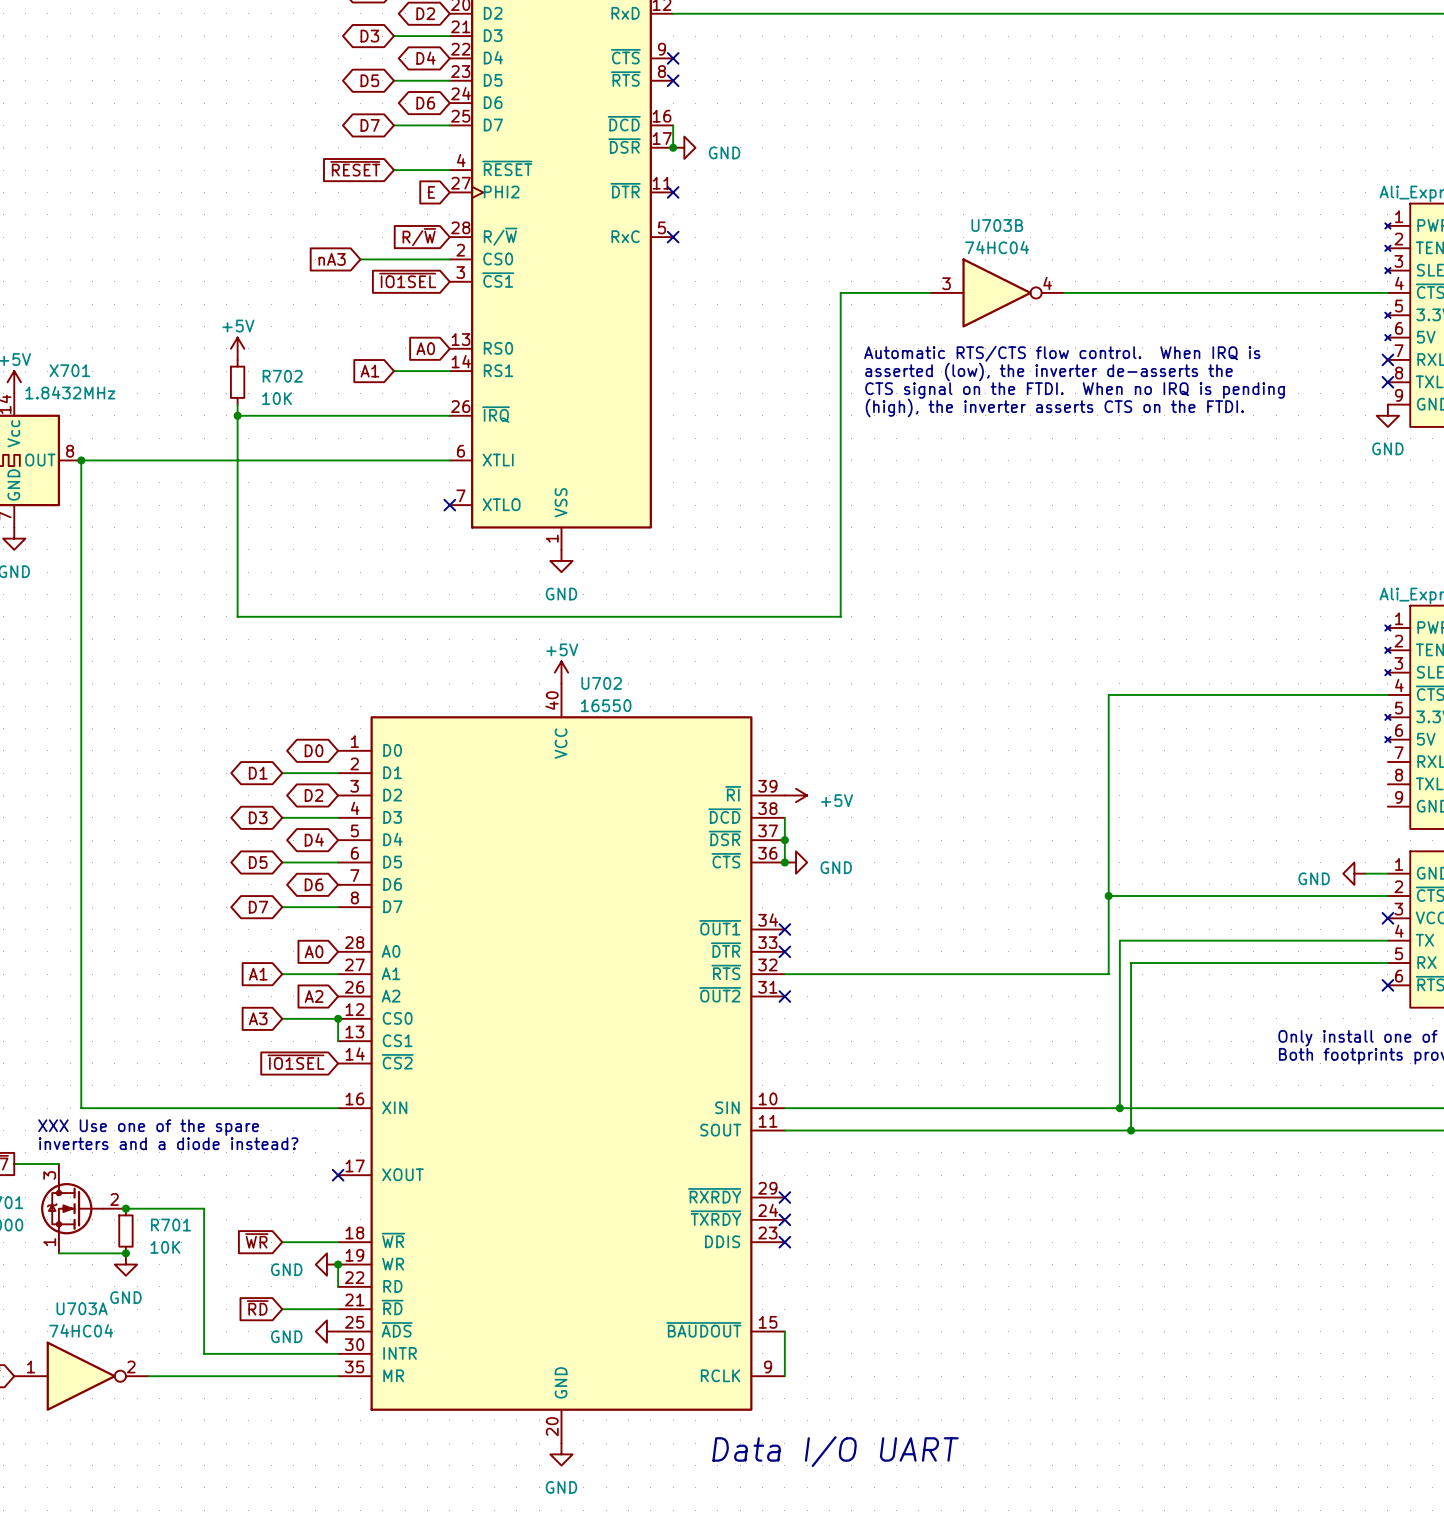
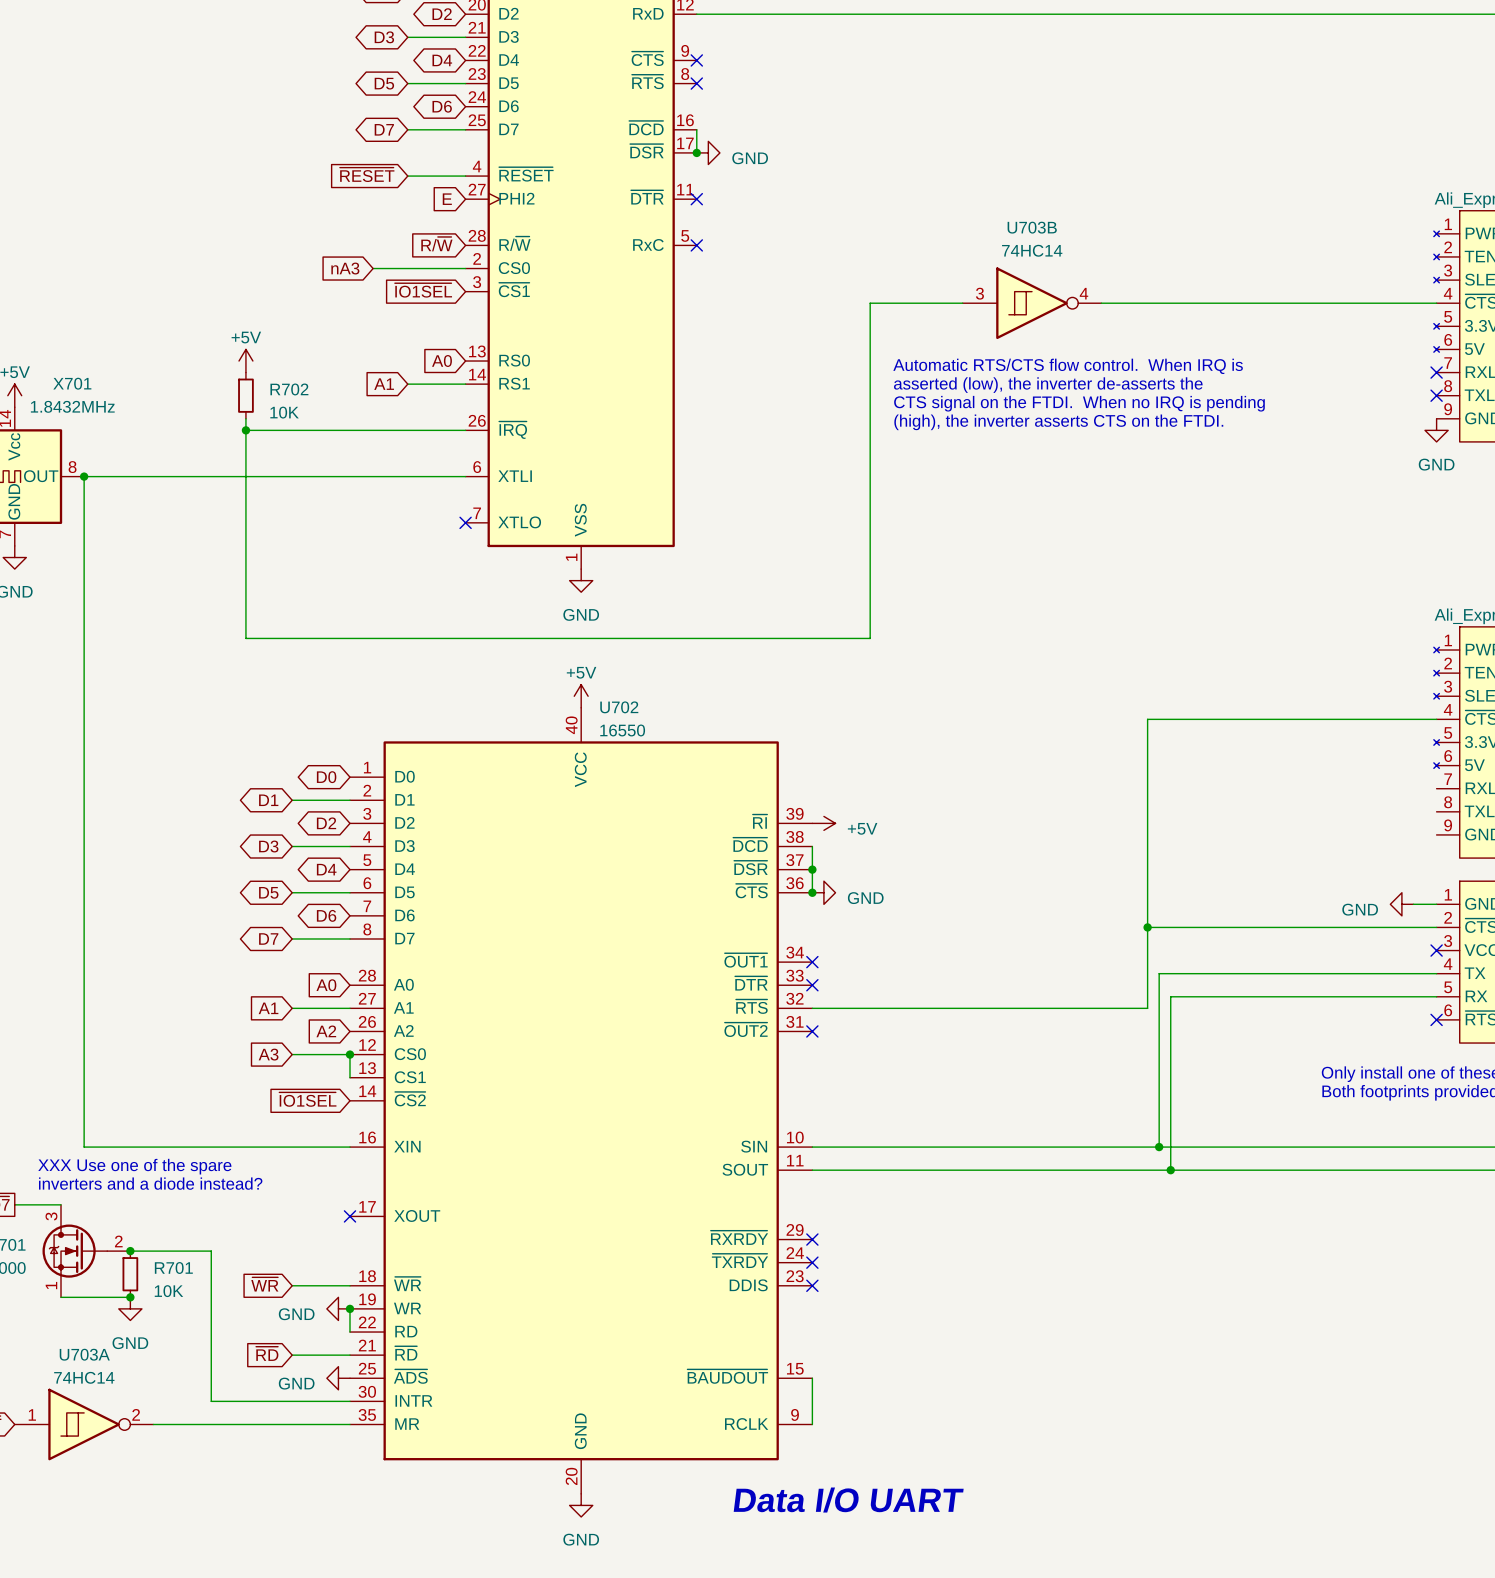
U703B value: 74HC04 (997, 247) -> 74HC14 (1032, 250)
U703B symbol: [930, 258, 1065, 328] -> [962, 267, 1102, 340]
U703A value: 74HC04 (81, 1330) -> 74HC14 (84, 1377)
U703A symbol: [14, 1341, 149, 1411] -> [14, 1388, 154, 1461]

